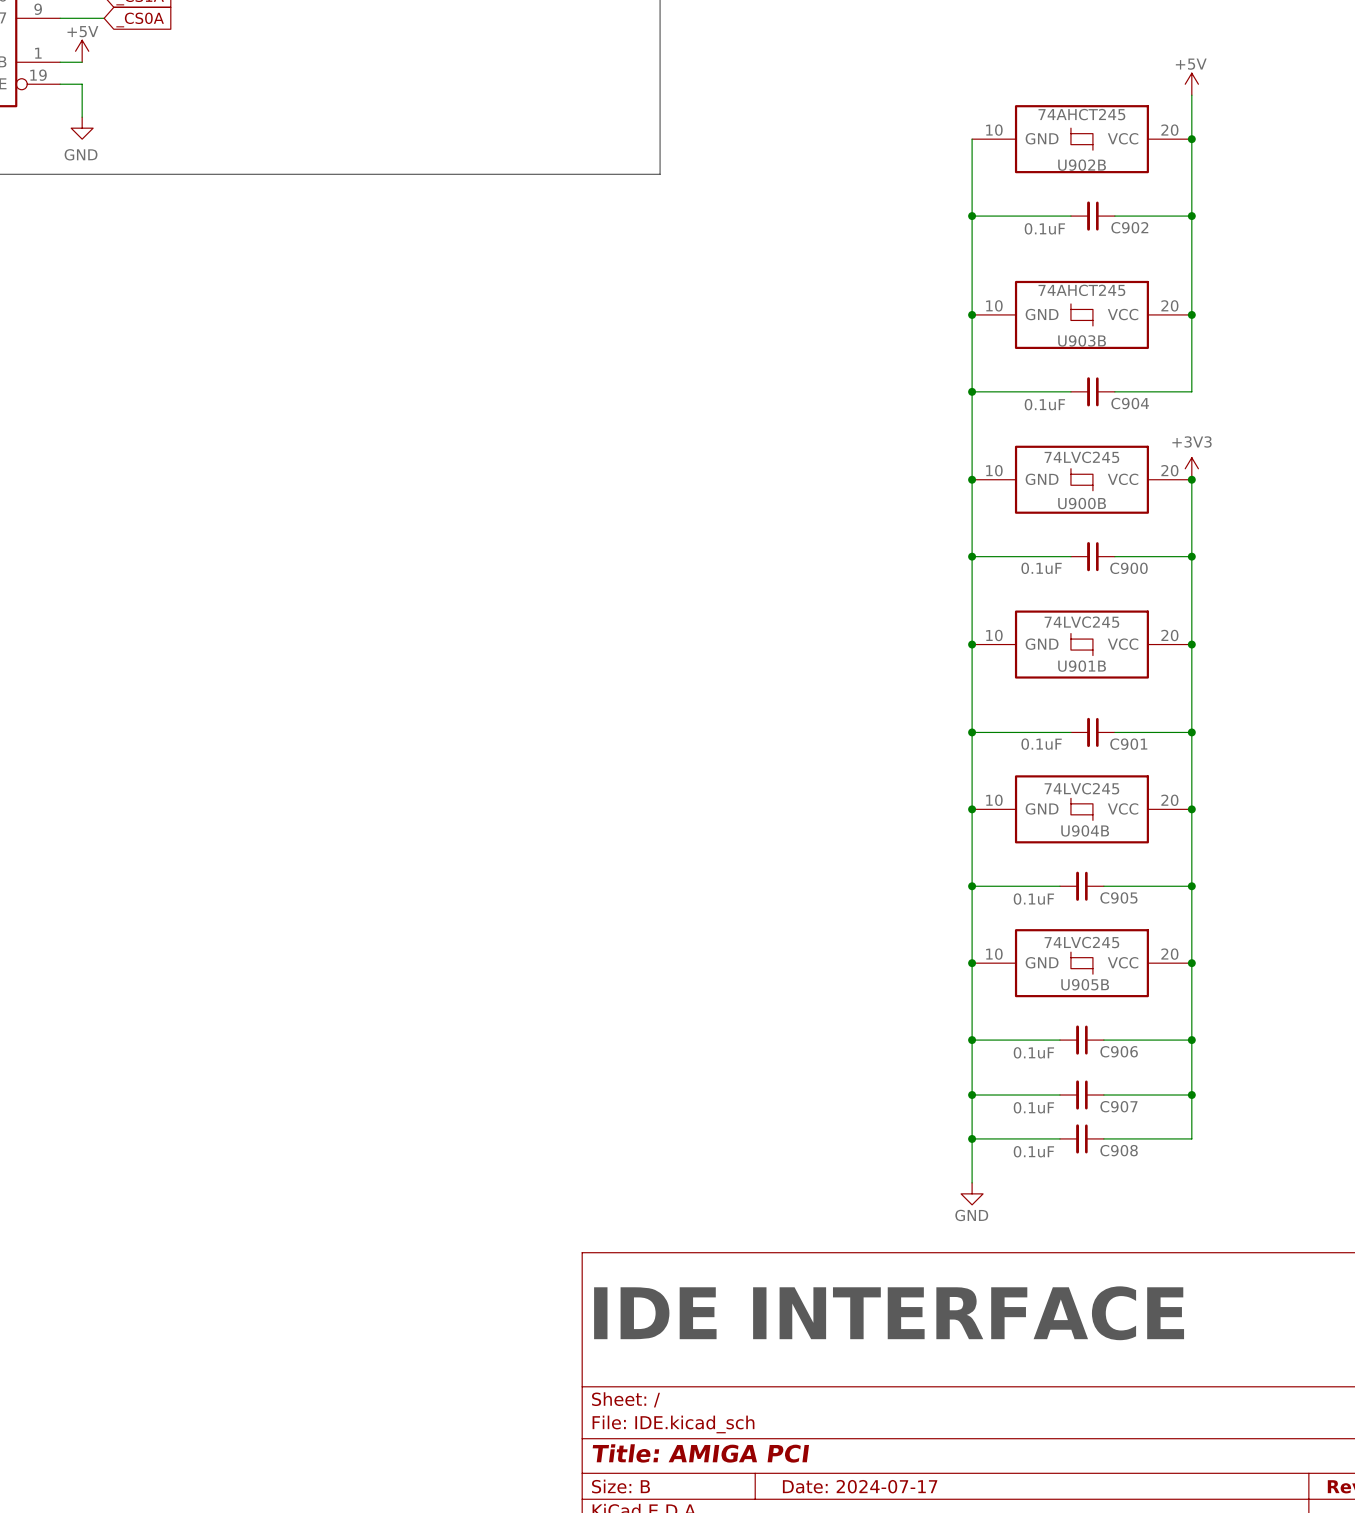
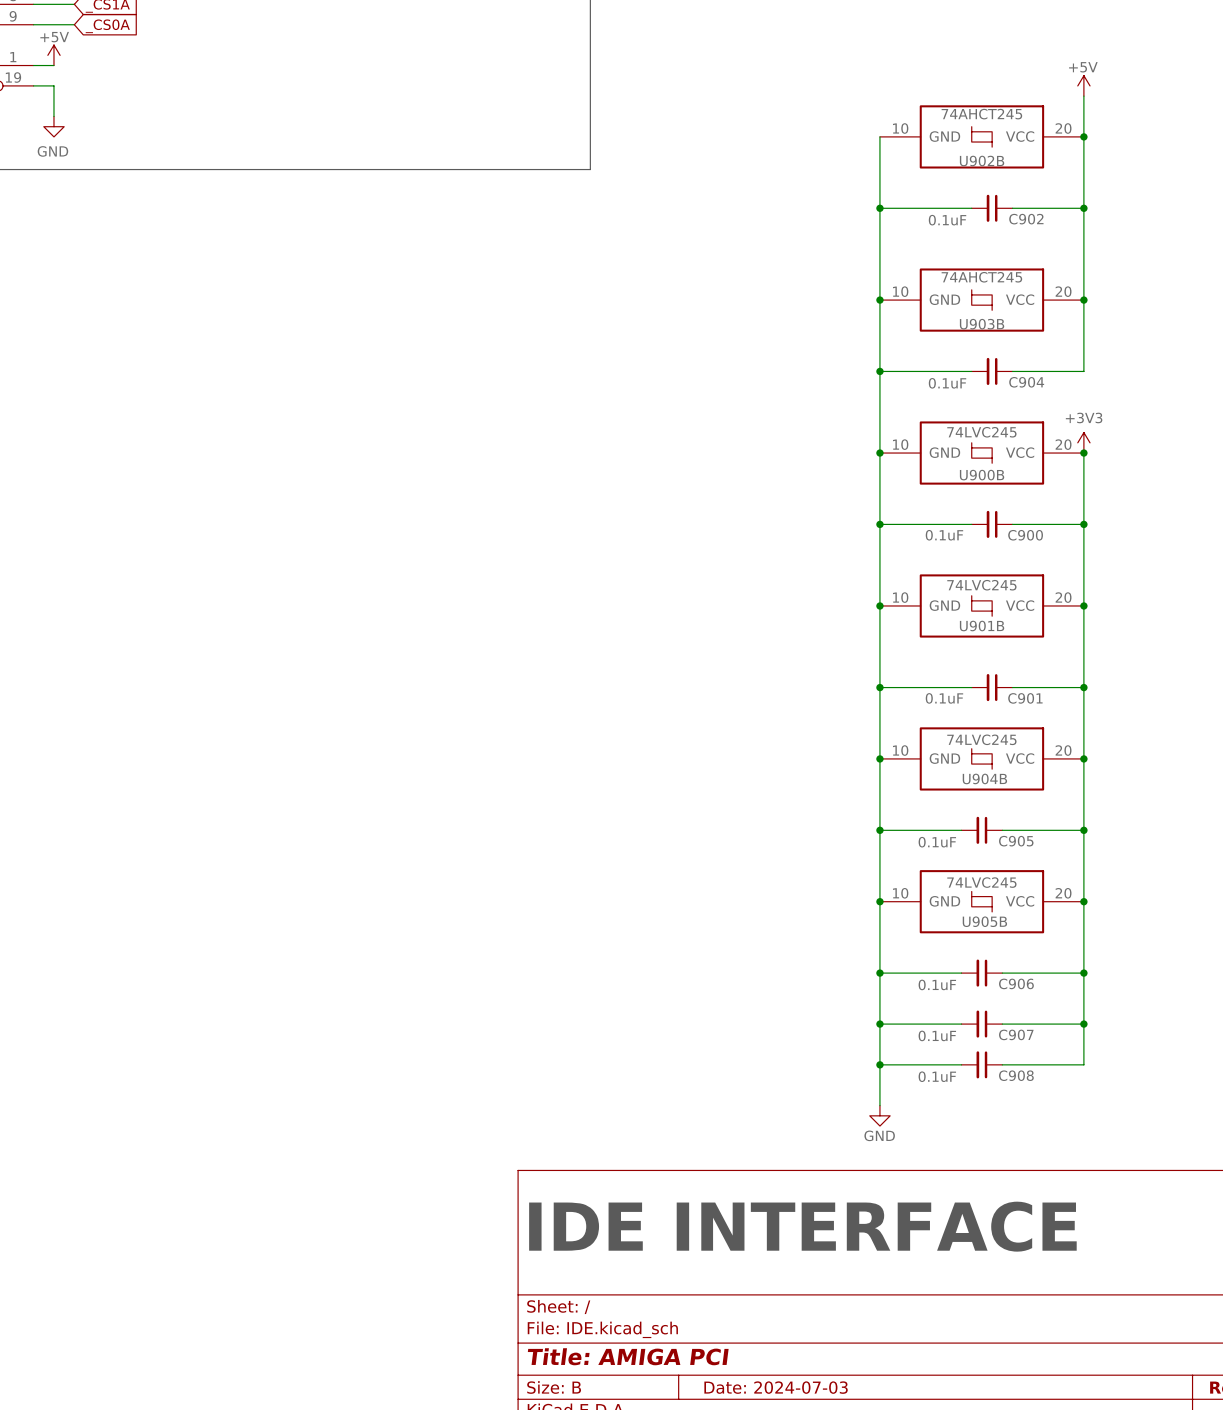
title block: Date: 2024-07-17 (860, 1486) -> Date: 2024-07-03 (776, 1387)

